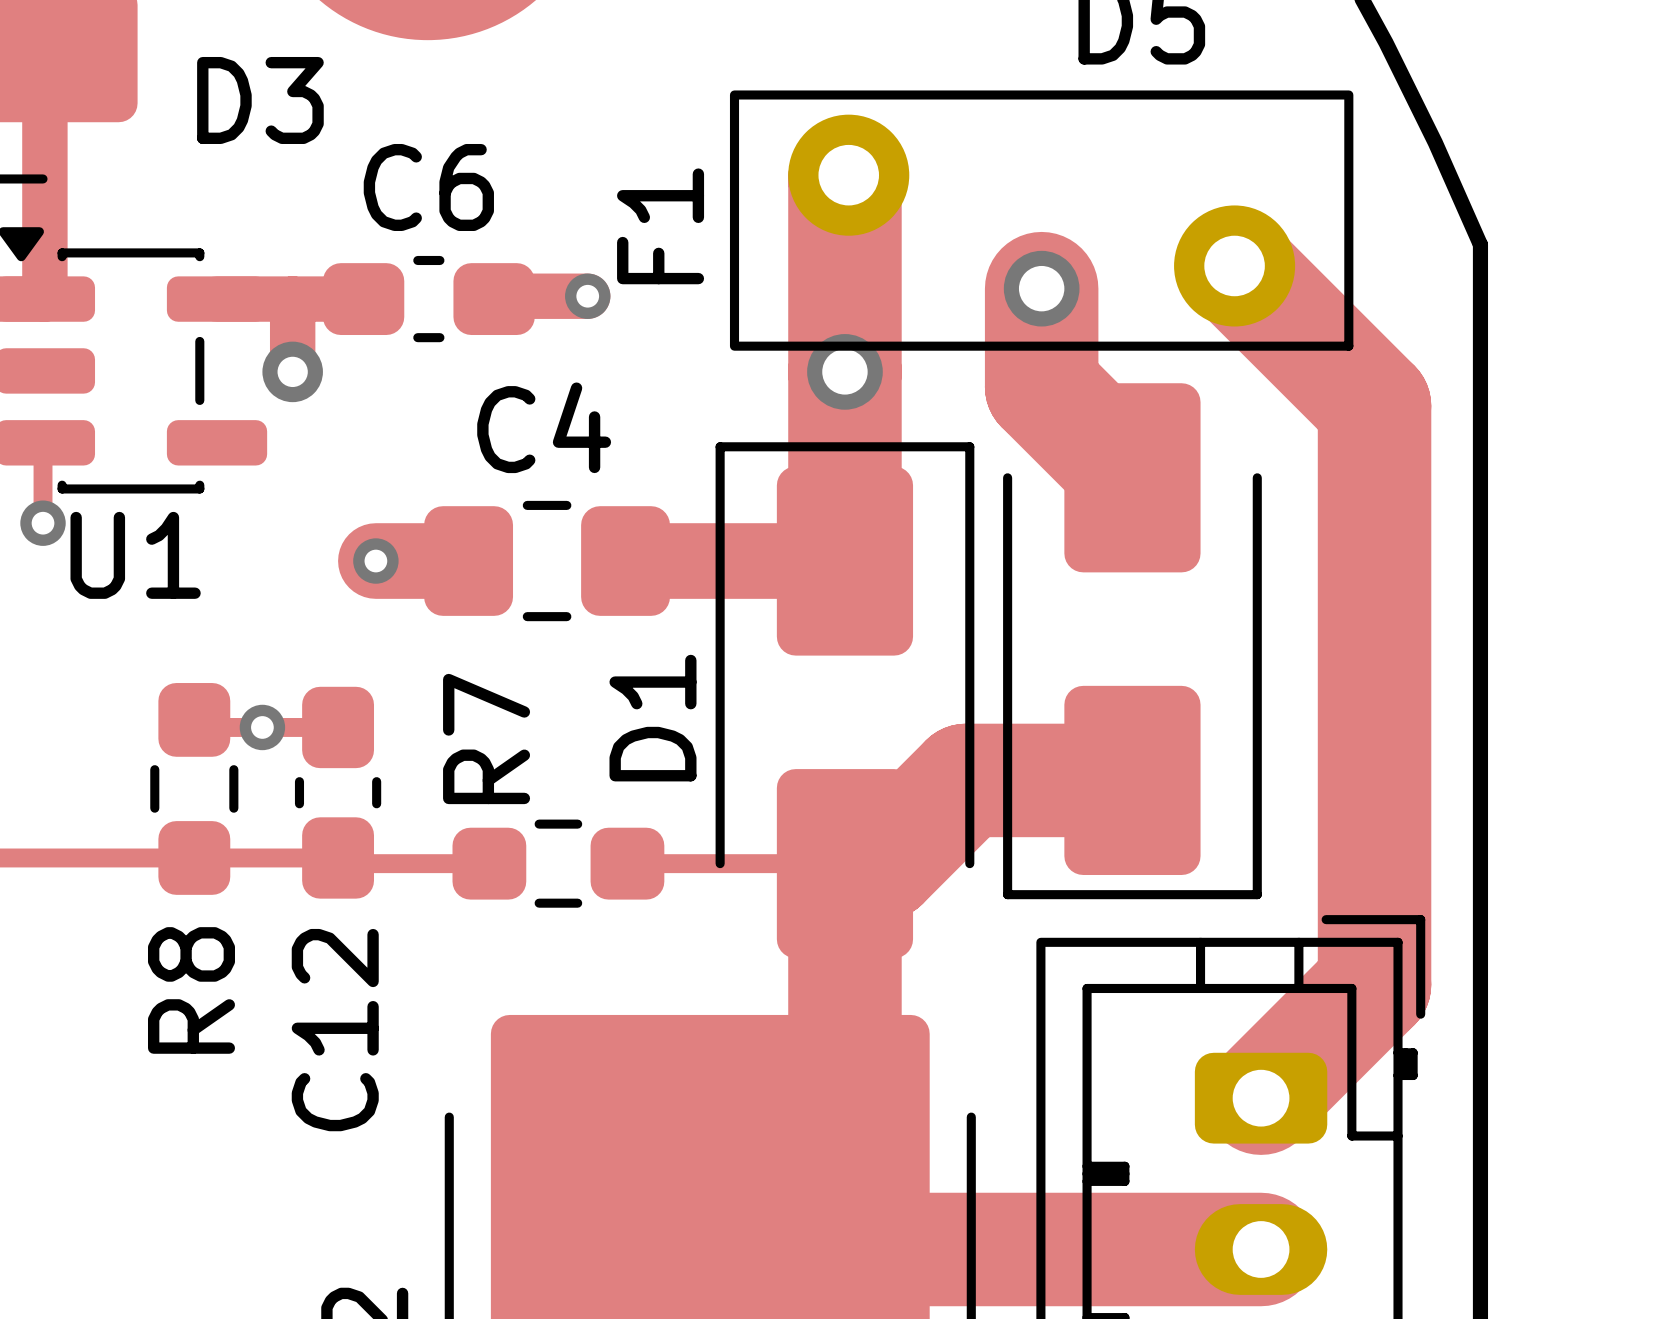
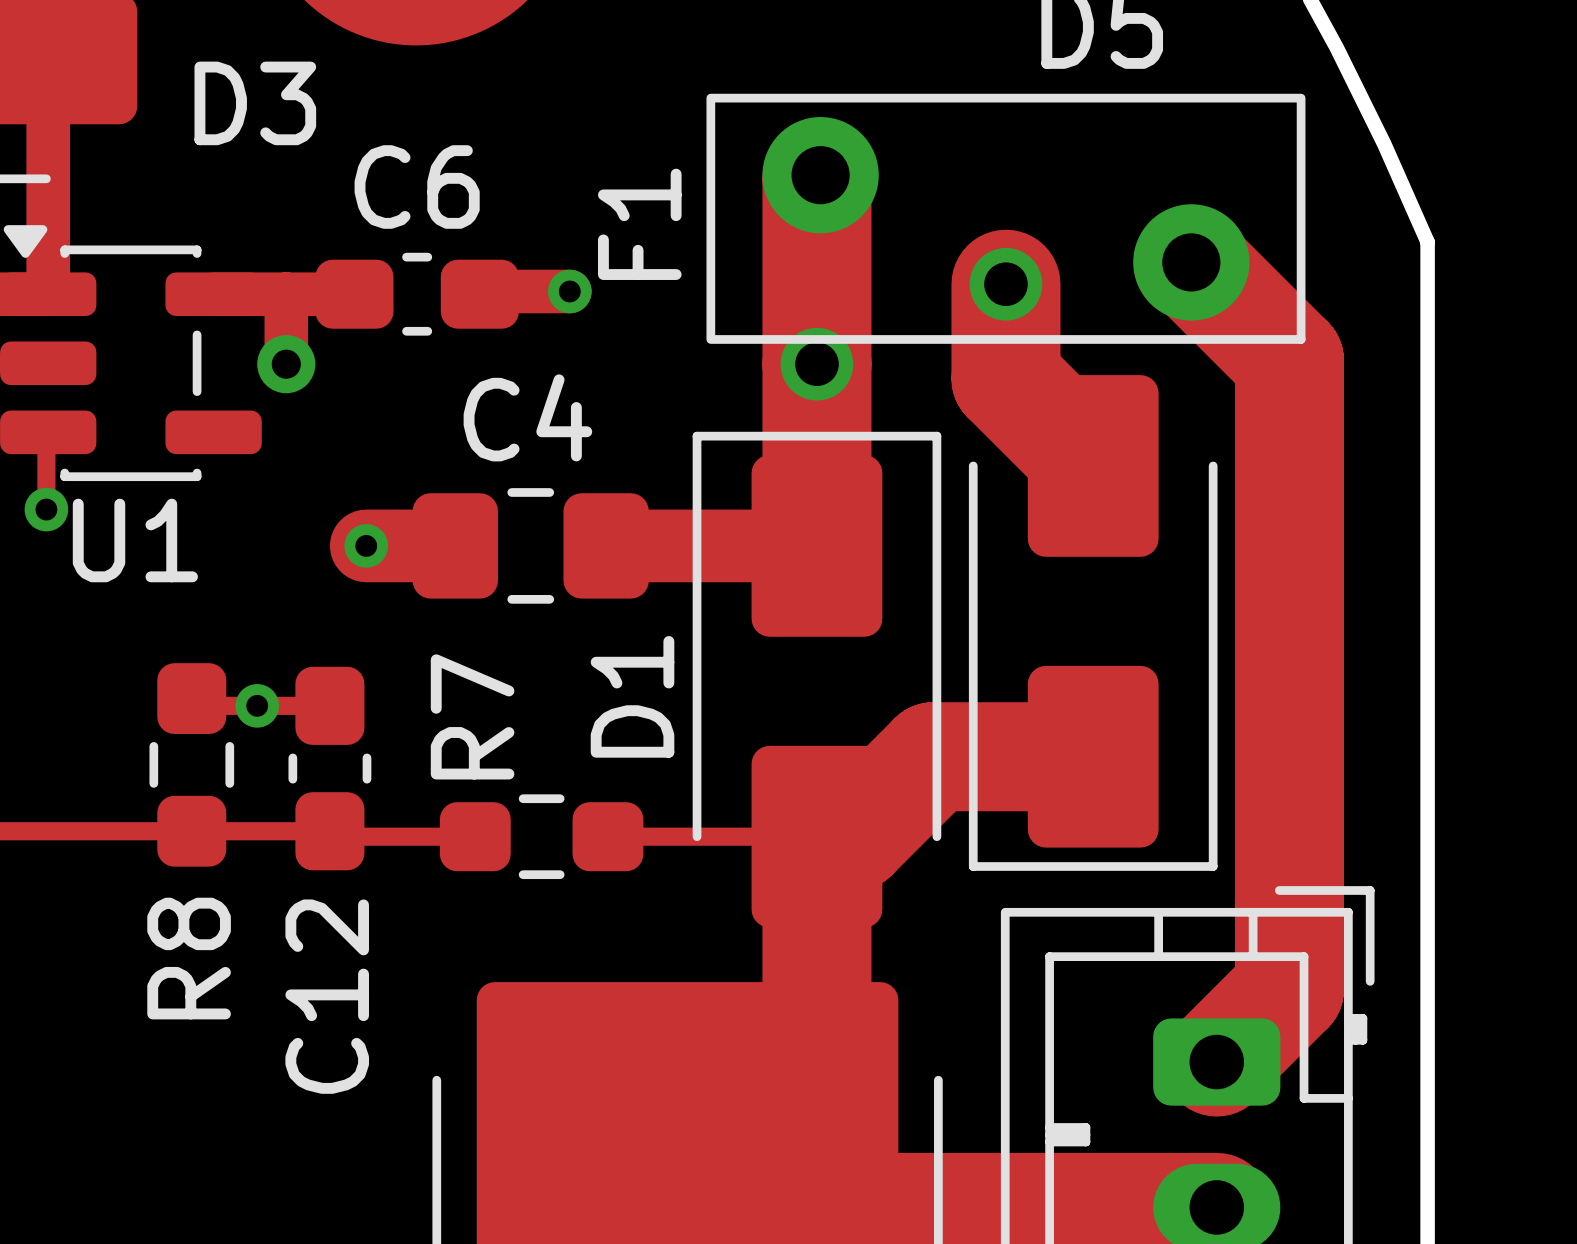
track: (1336, 368) (1374, 405) (1374, 984) (1336, 1022) -> (1289, 360) (1289, 989)

